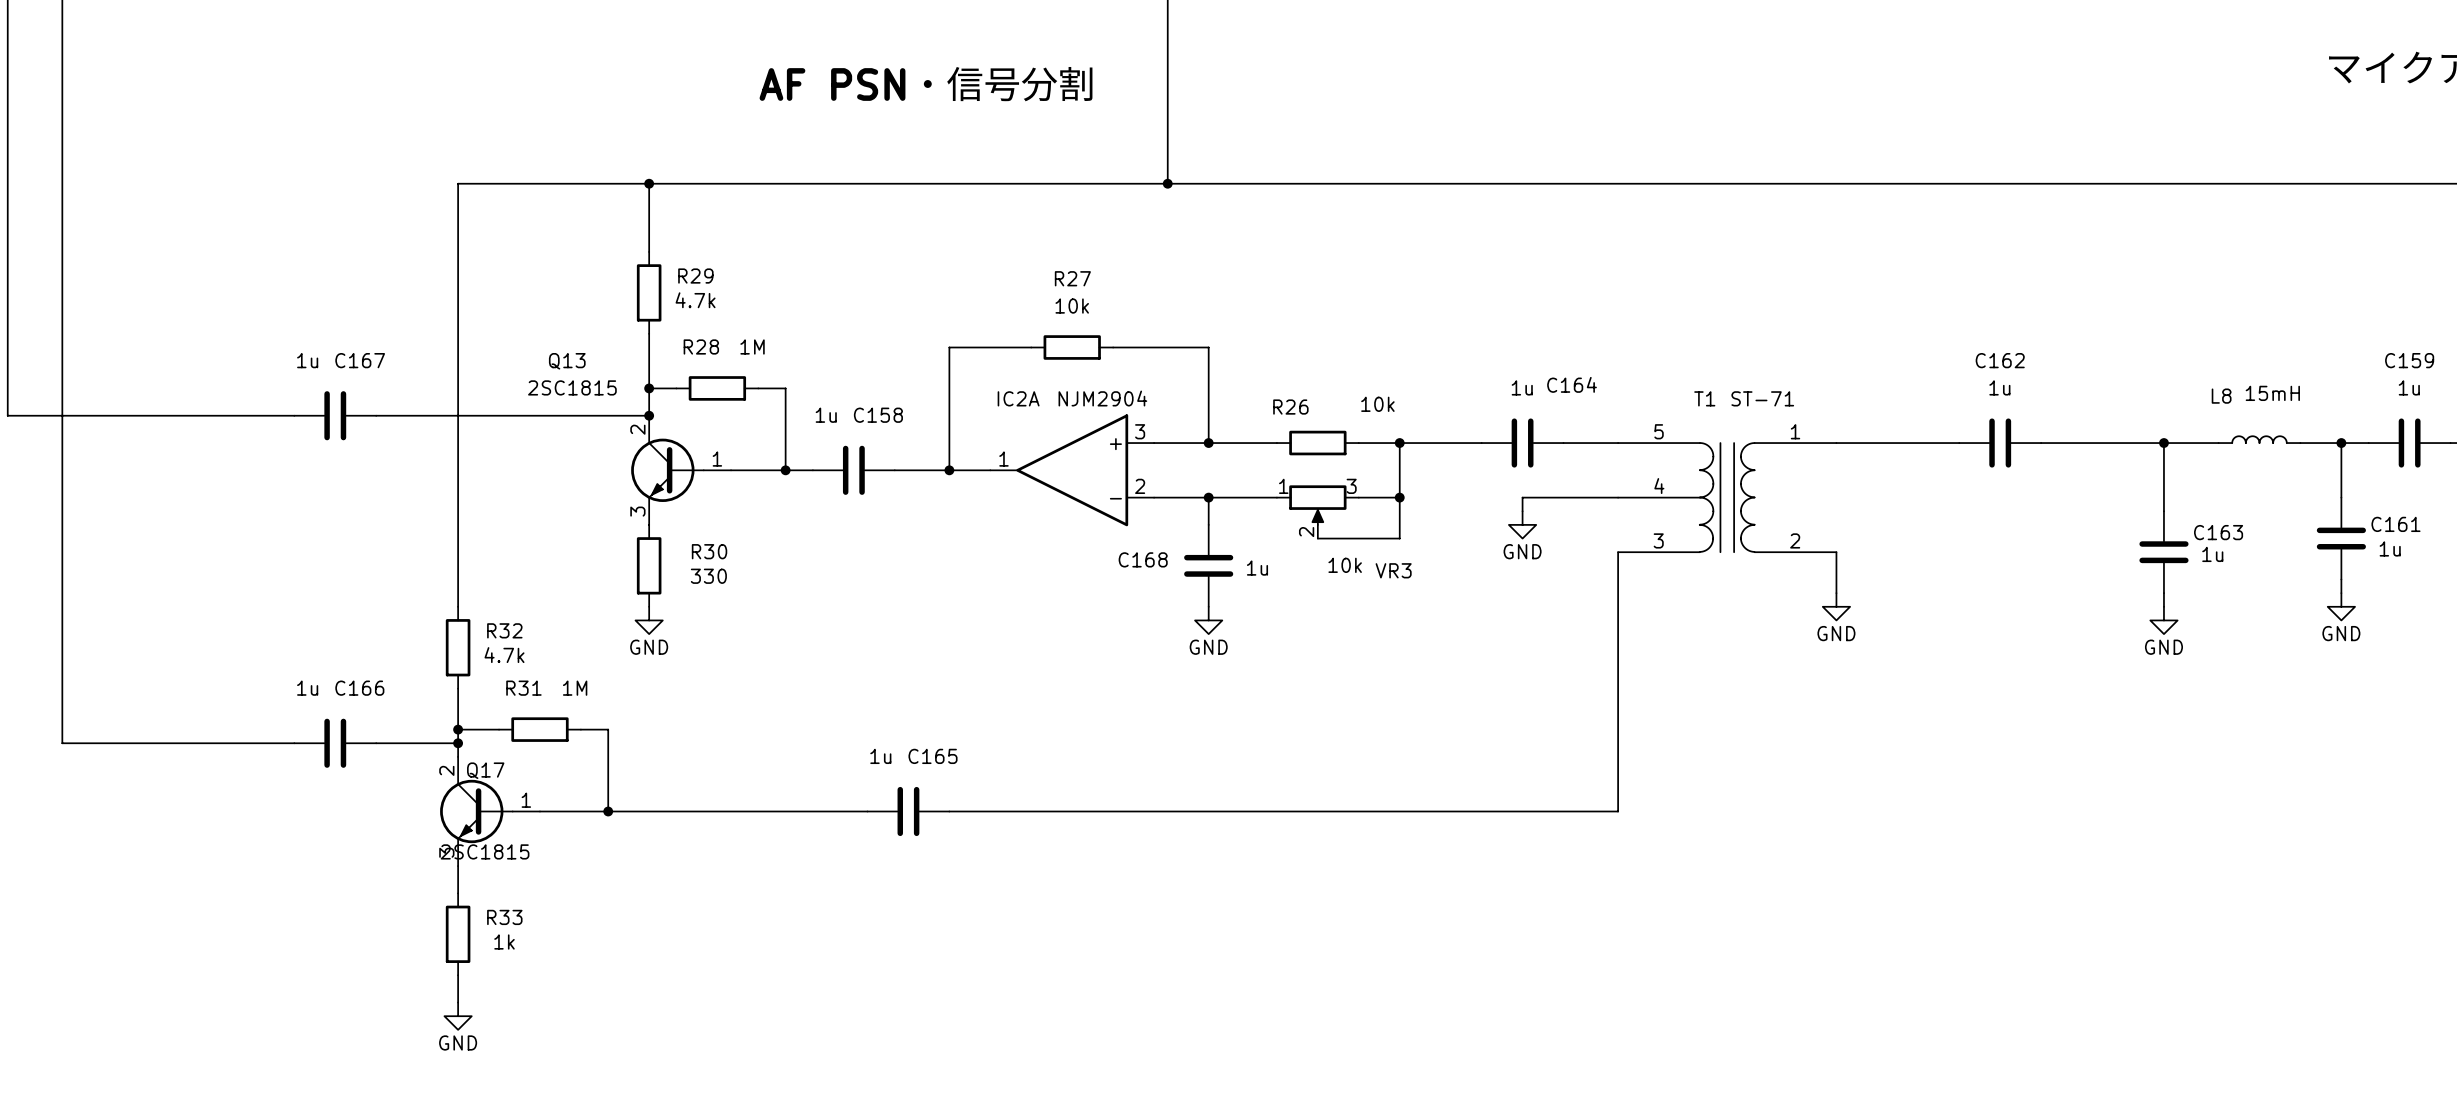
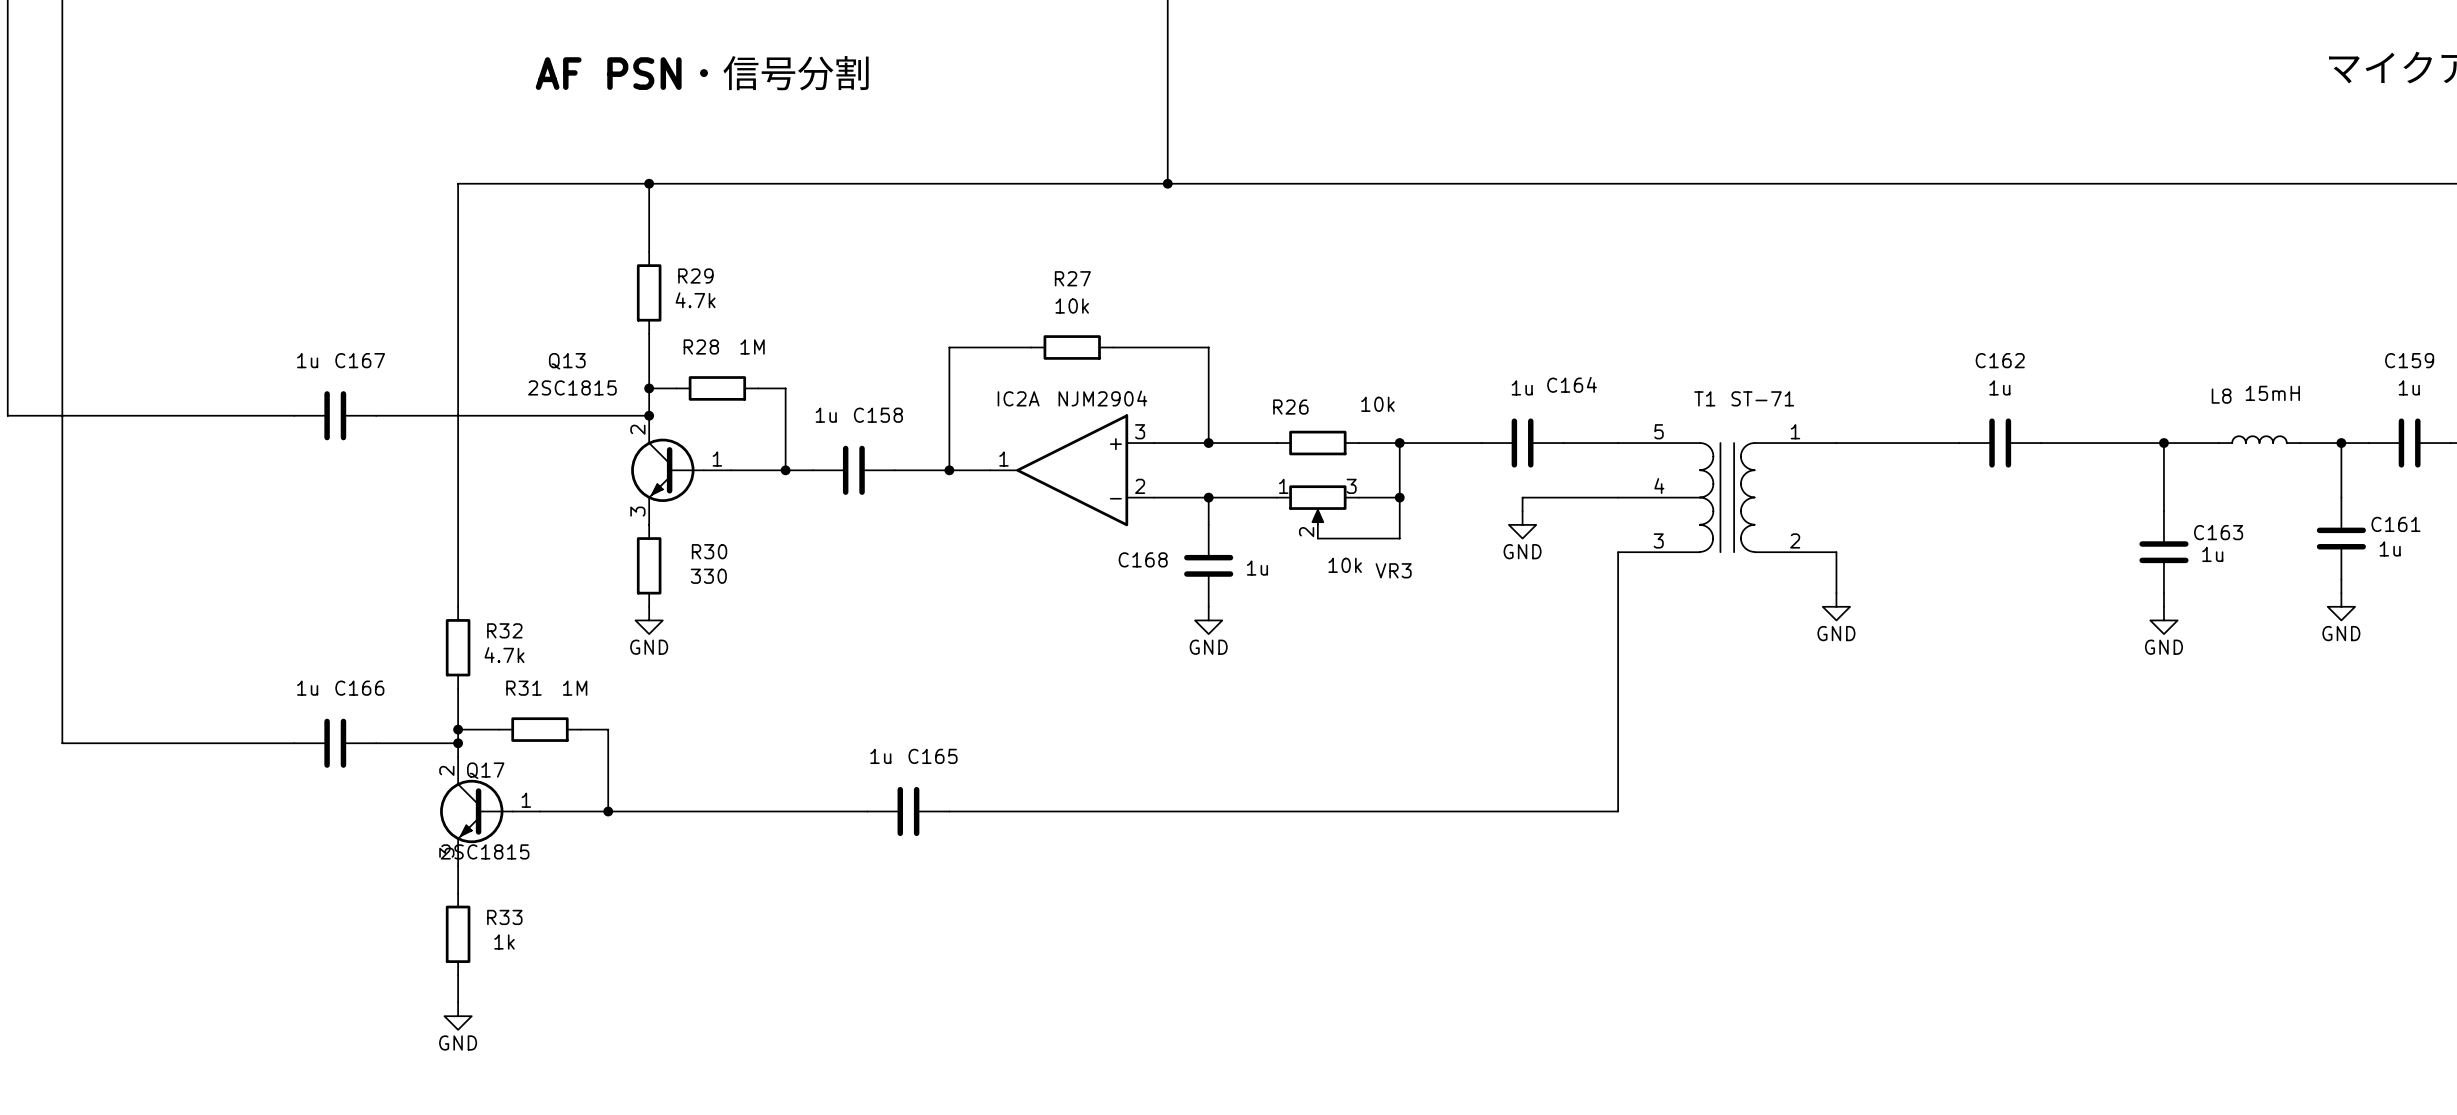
text position: AF PSN・信号分割 (927, 84) -> AF PSN・信号分割 (703, 73)

